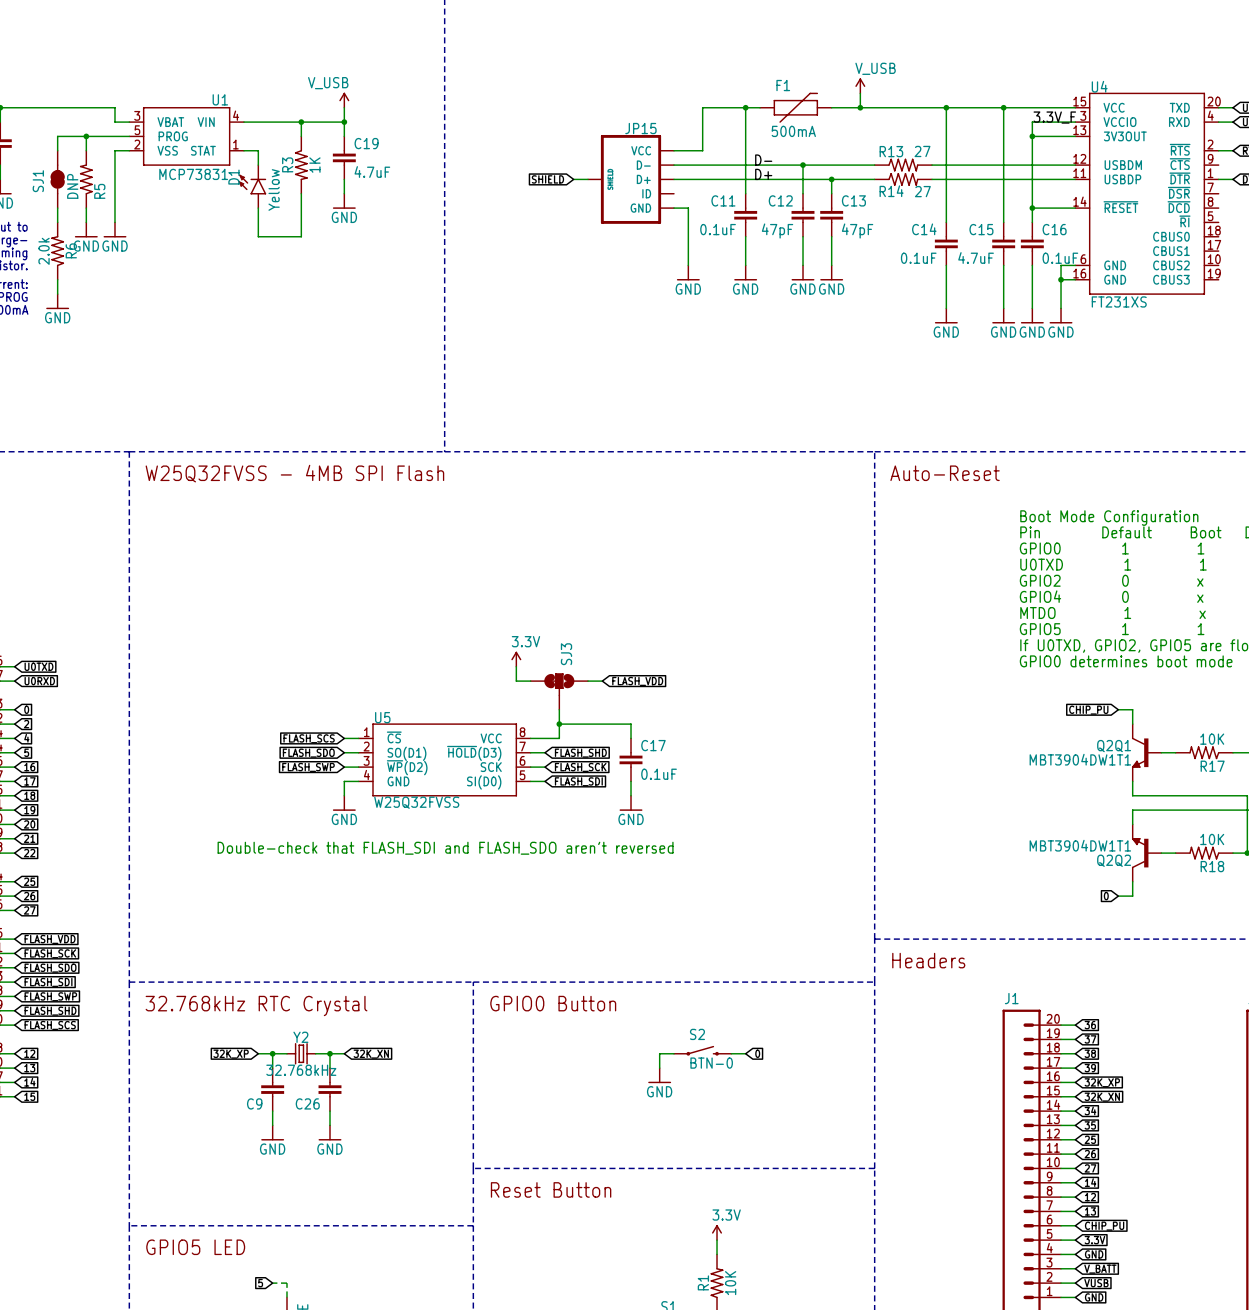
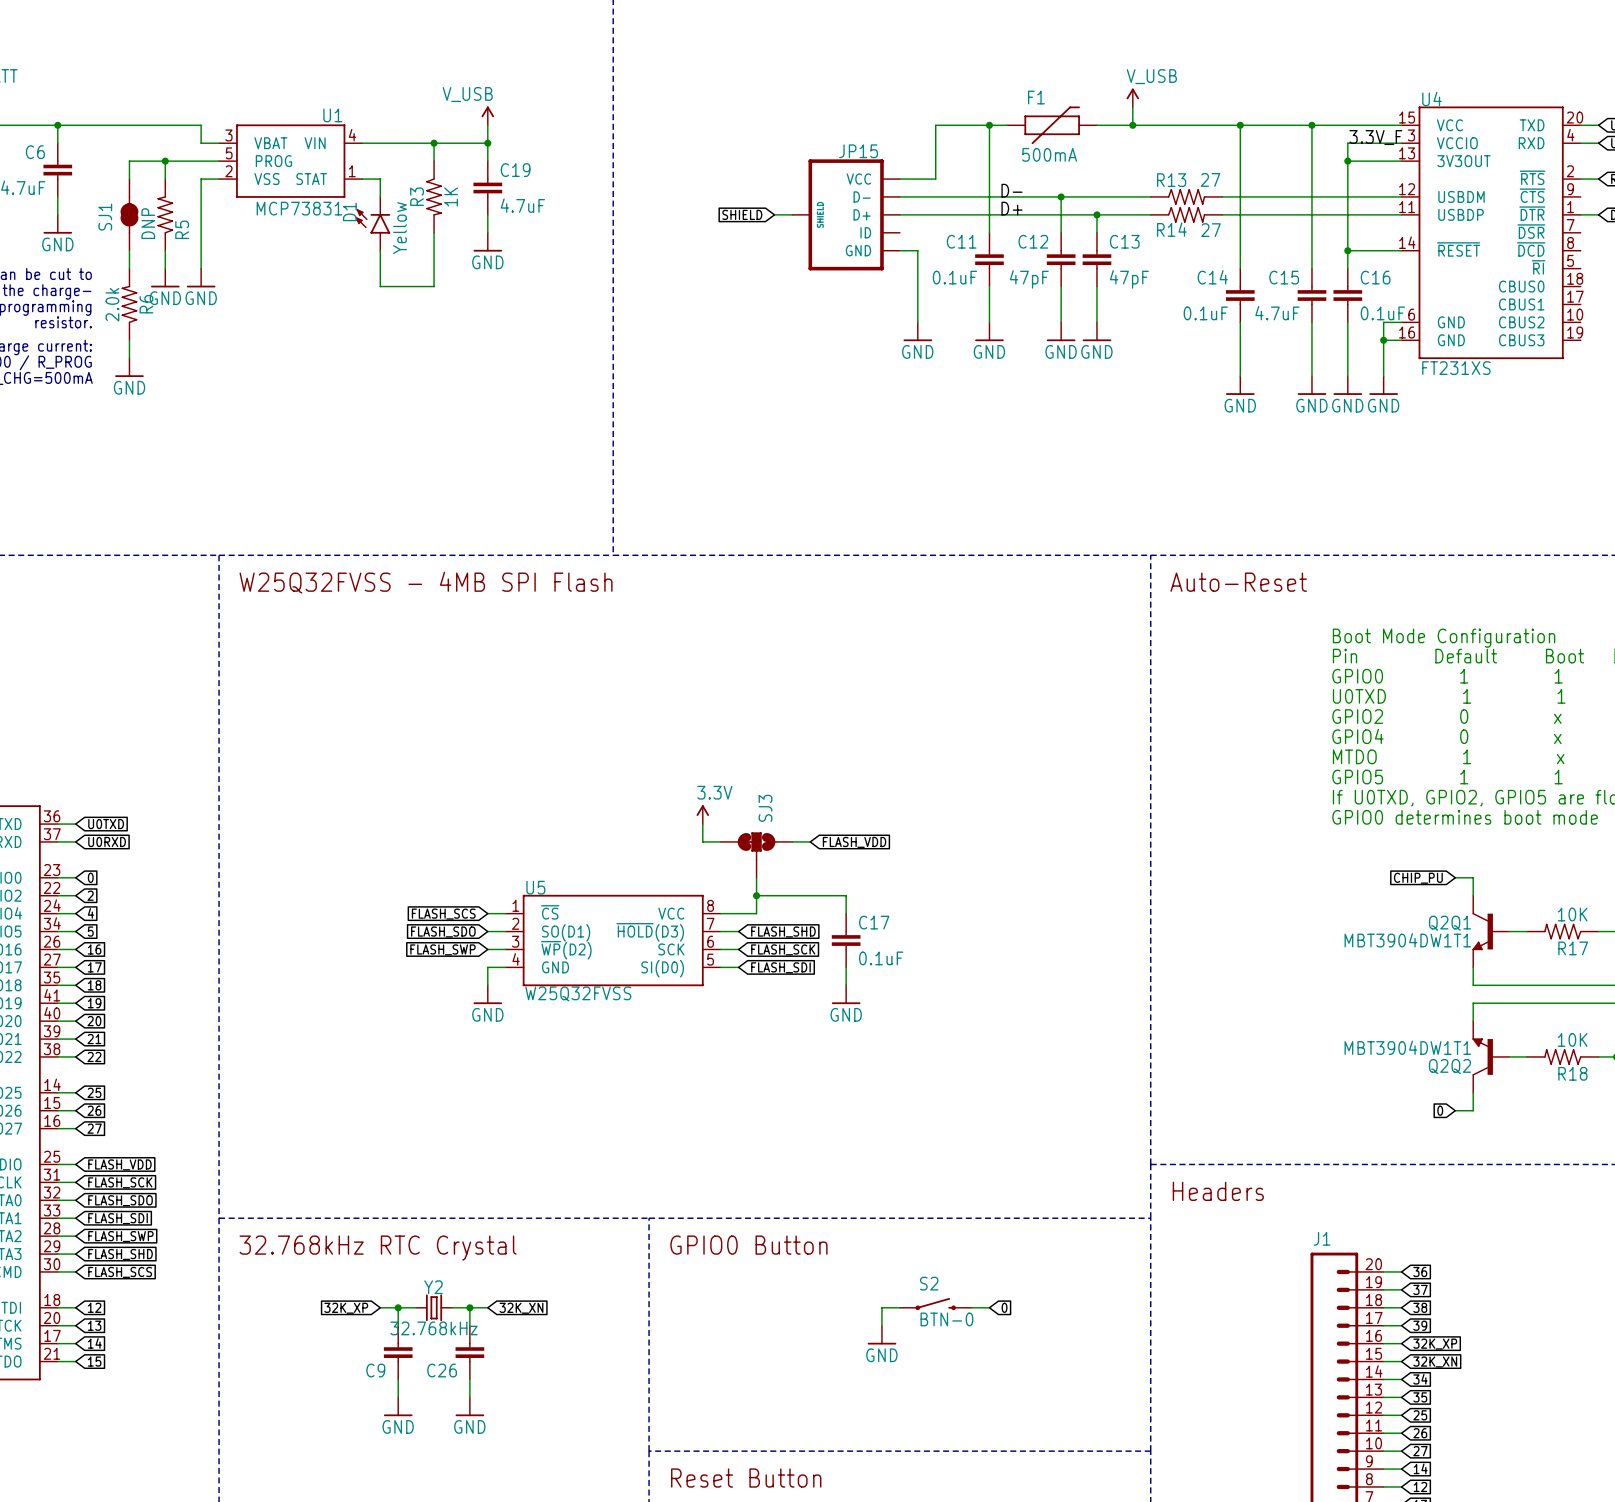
text: Double-check that FLASH_SDI and FLASH_SDO aren't reversed (445, 848) -> none

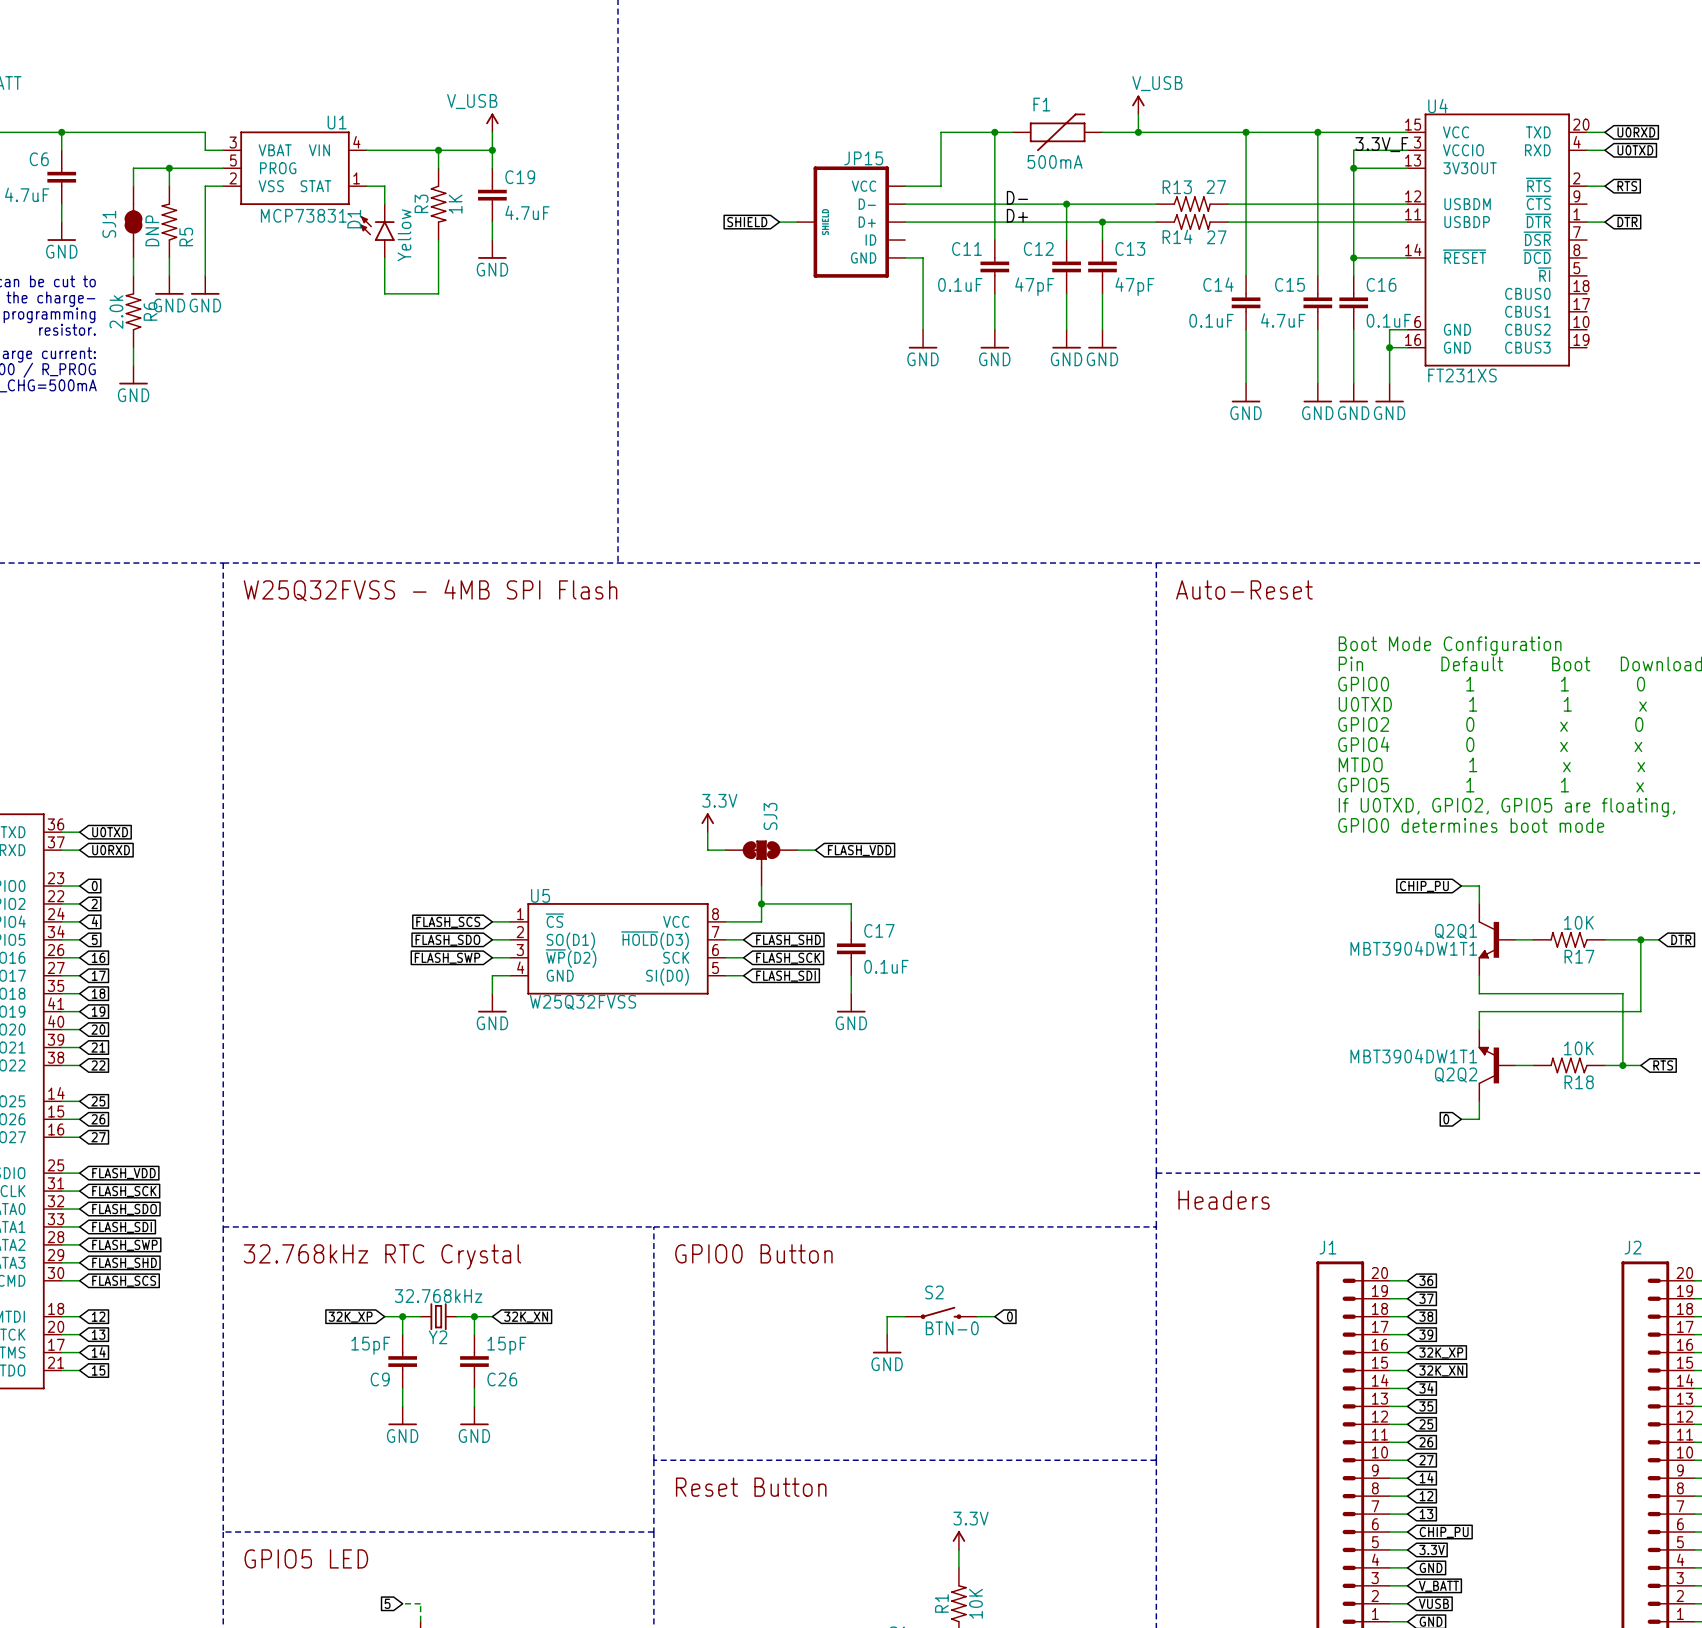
Y2 name position: Y2 (433, 1287) -> Y2 (438, 1337)
Y2 value position: 32.768kHz (434, 1328) -> 32.768kHz (438, 1296)
C9 value: none -> 15pF (370, 1345)
C26 value: none -> 15pF (506, 1345)
C26 name position: C26 (442, 1370) -> C26 (502, 1379)

